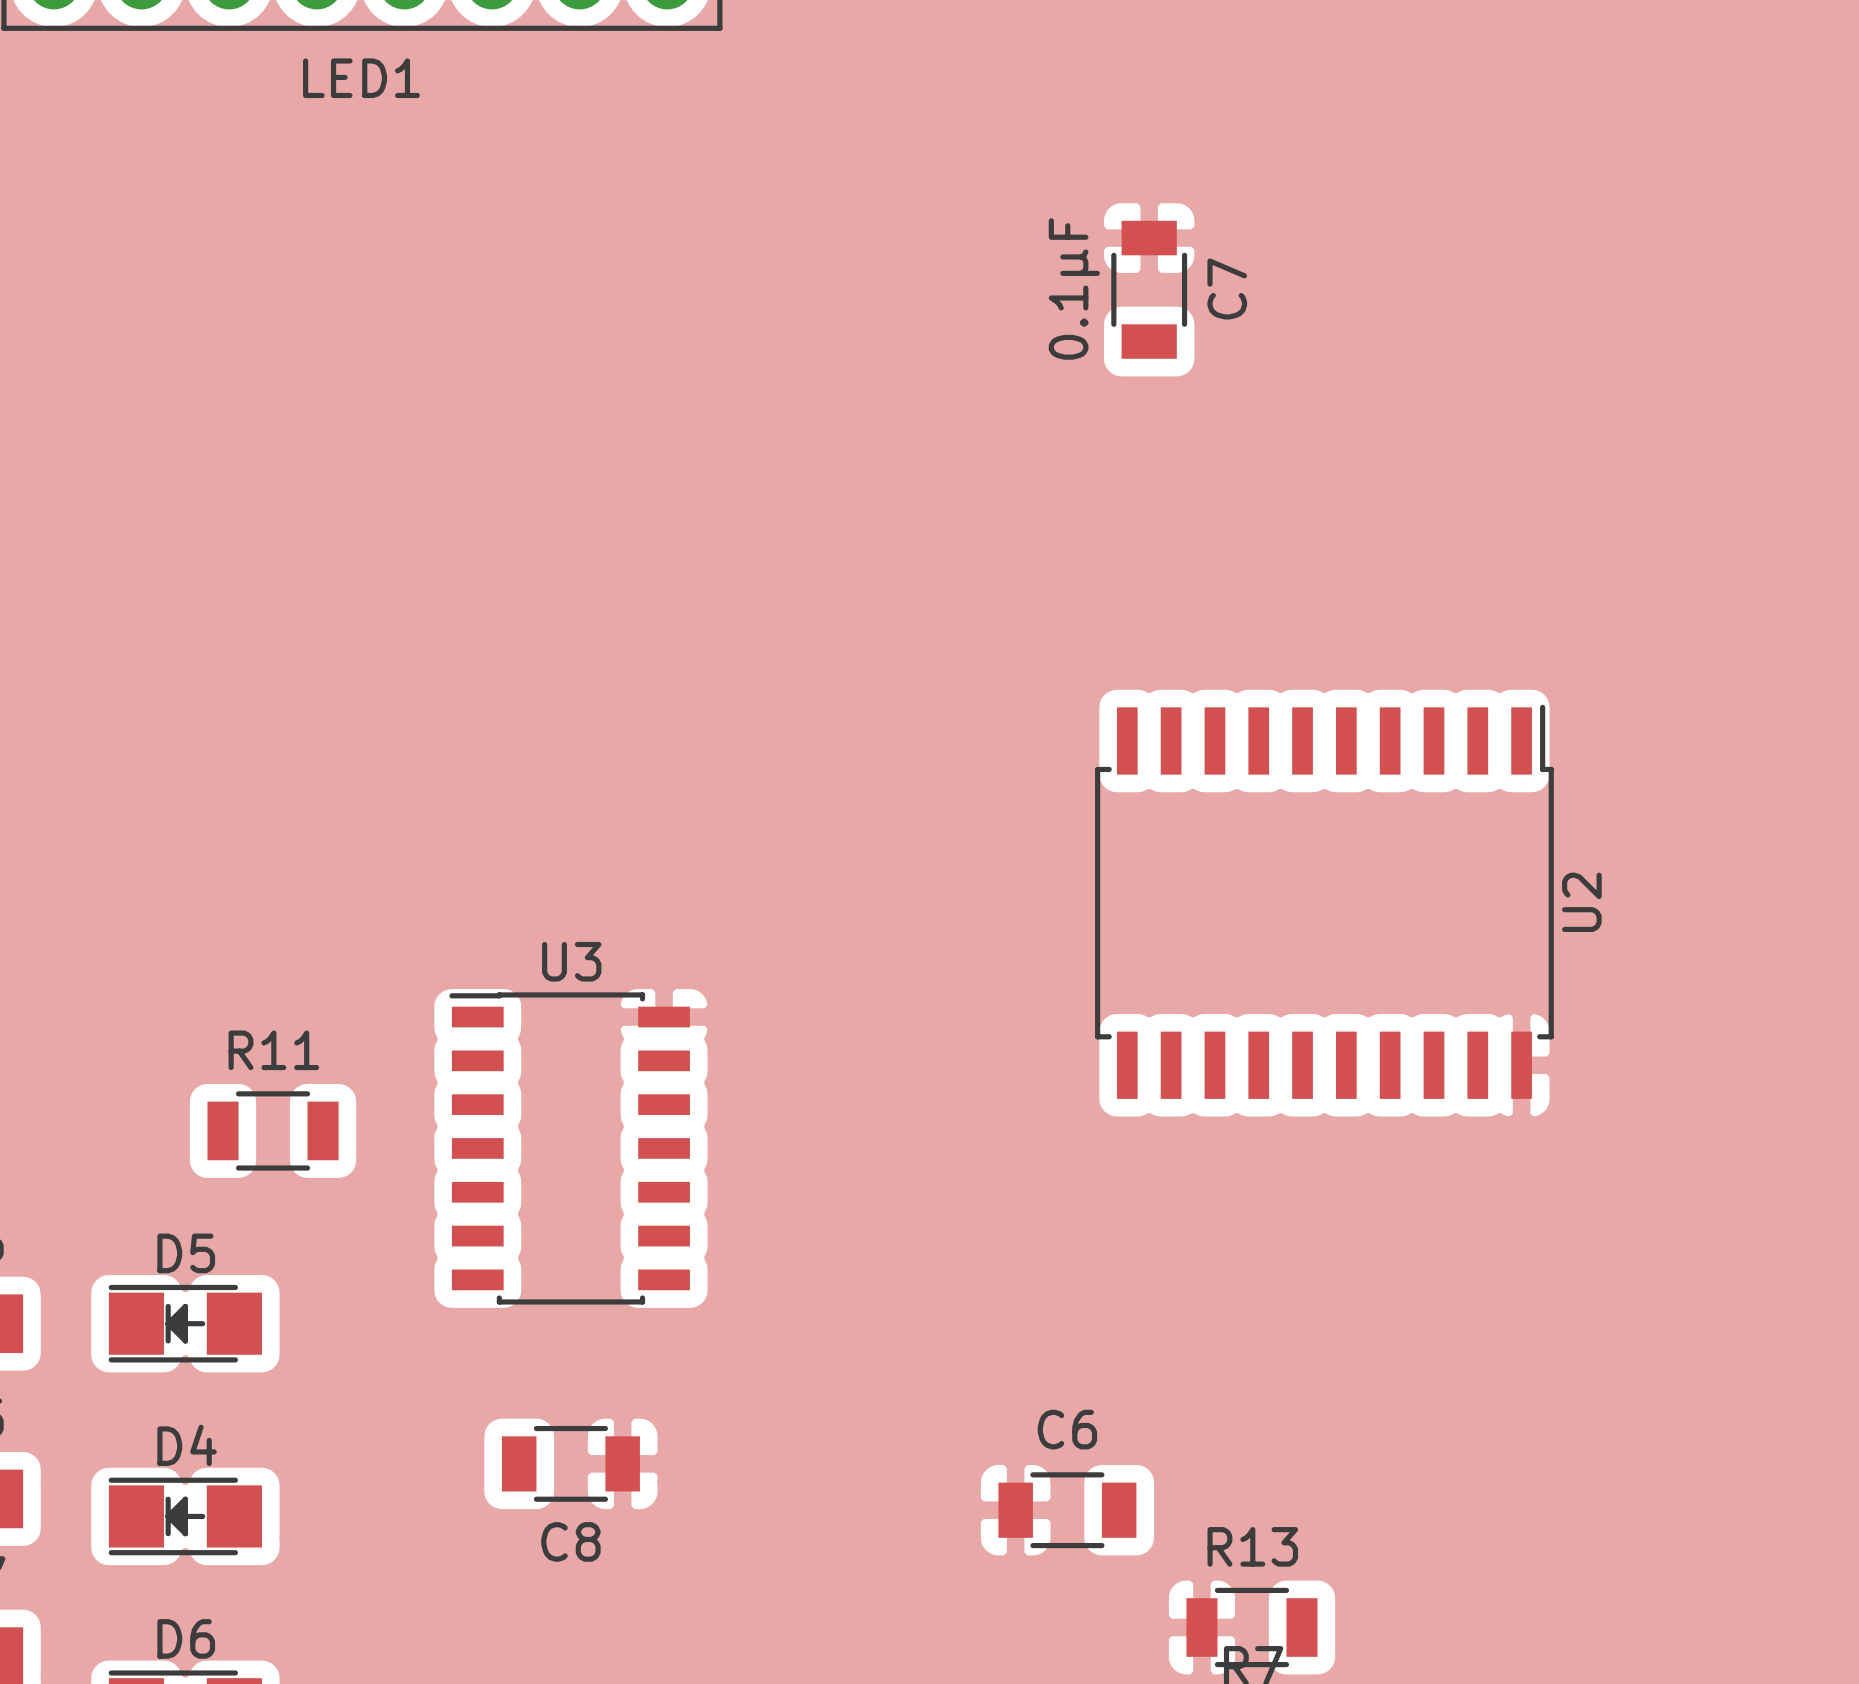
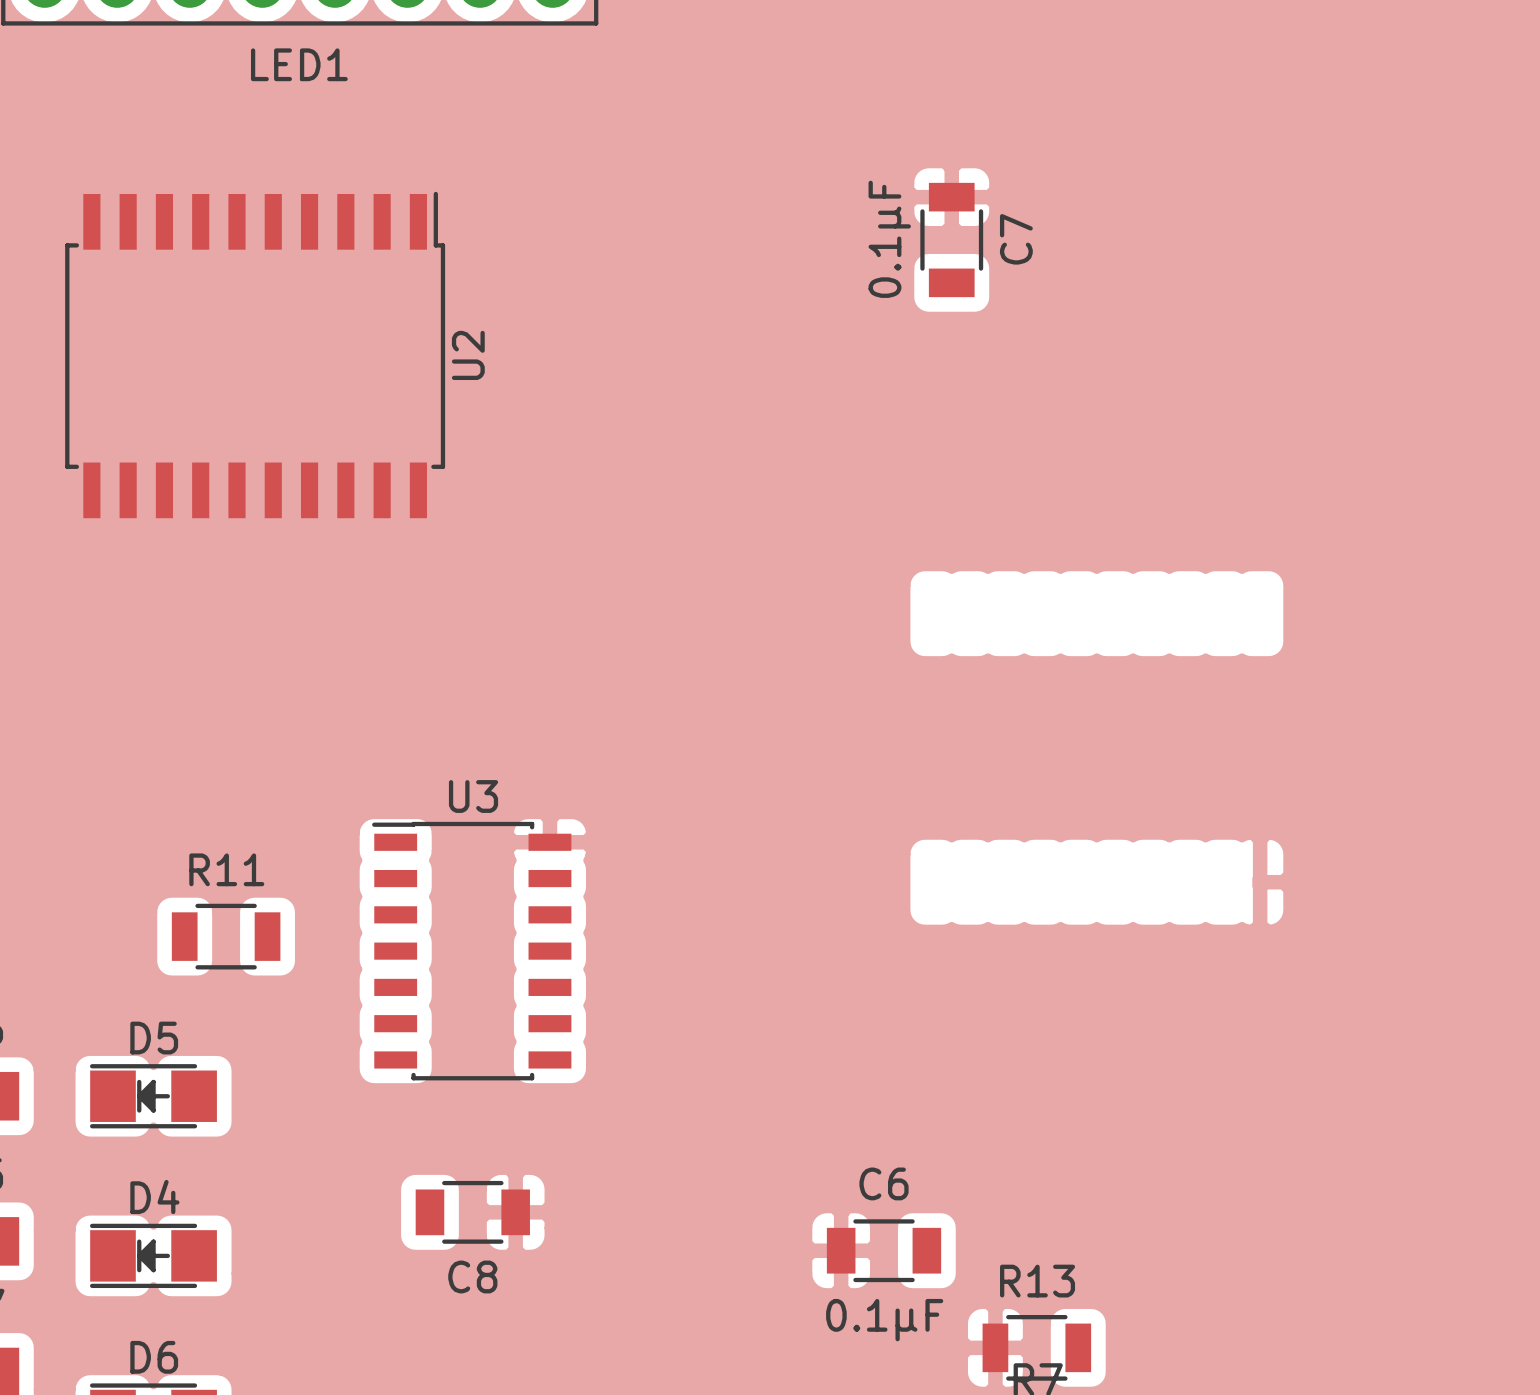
U2 position: (1324, 901) -> (255, 355)
C6 value: none -> 0.1µF (884, 1320)

